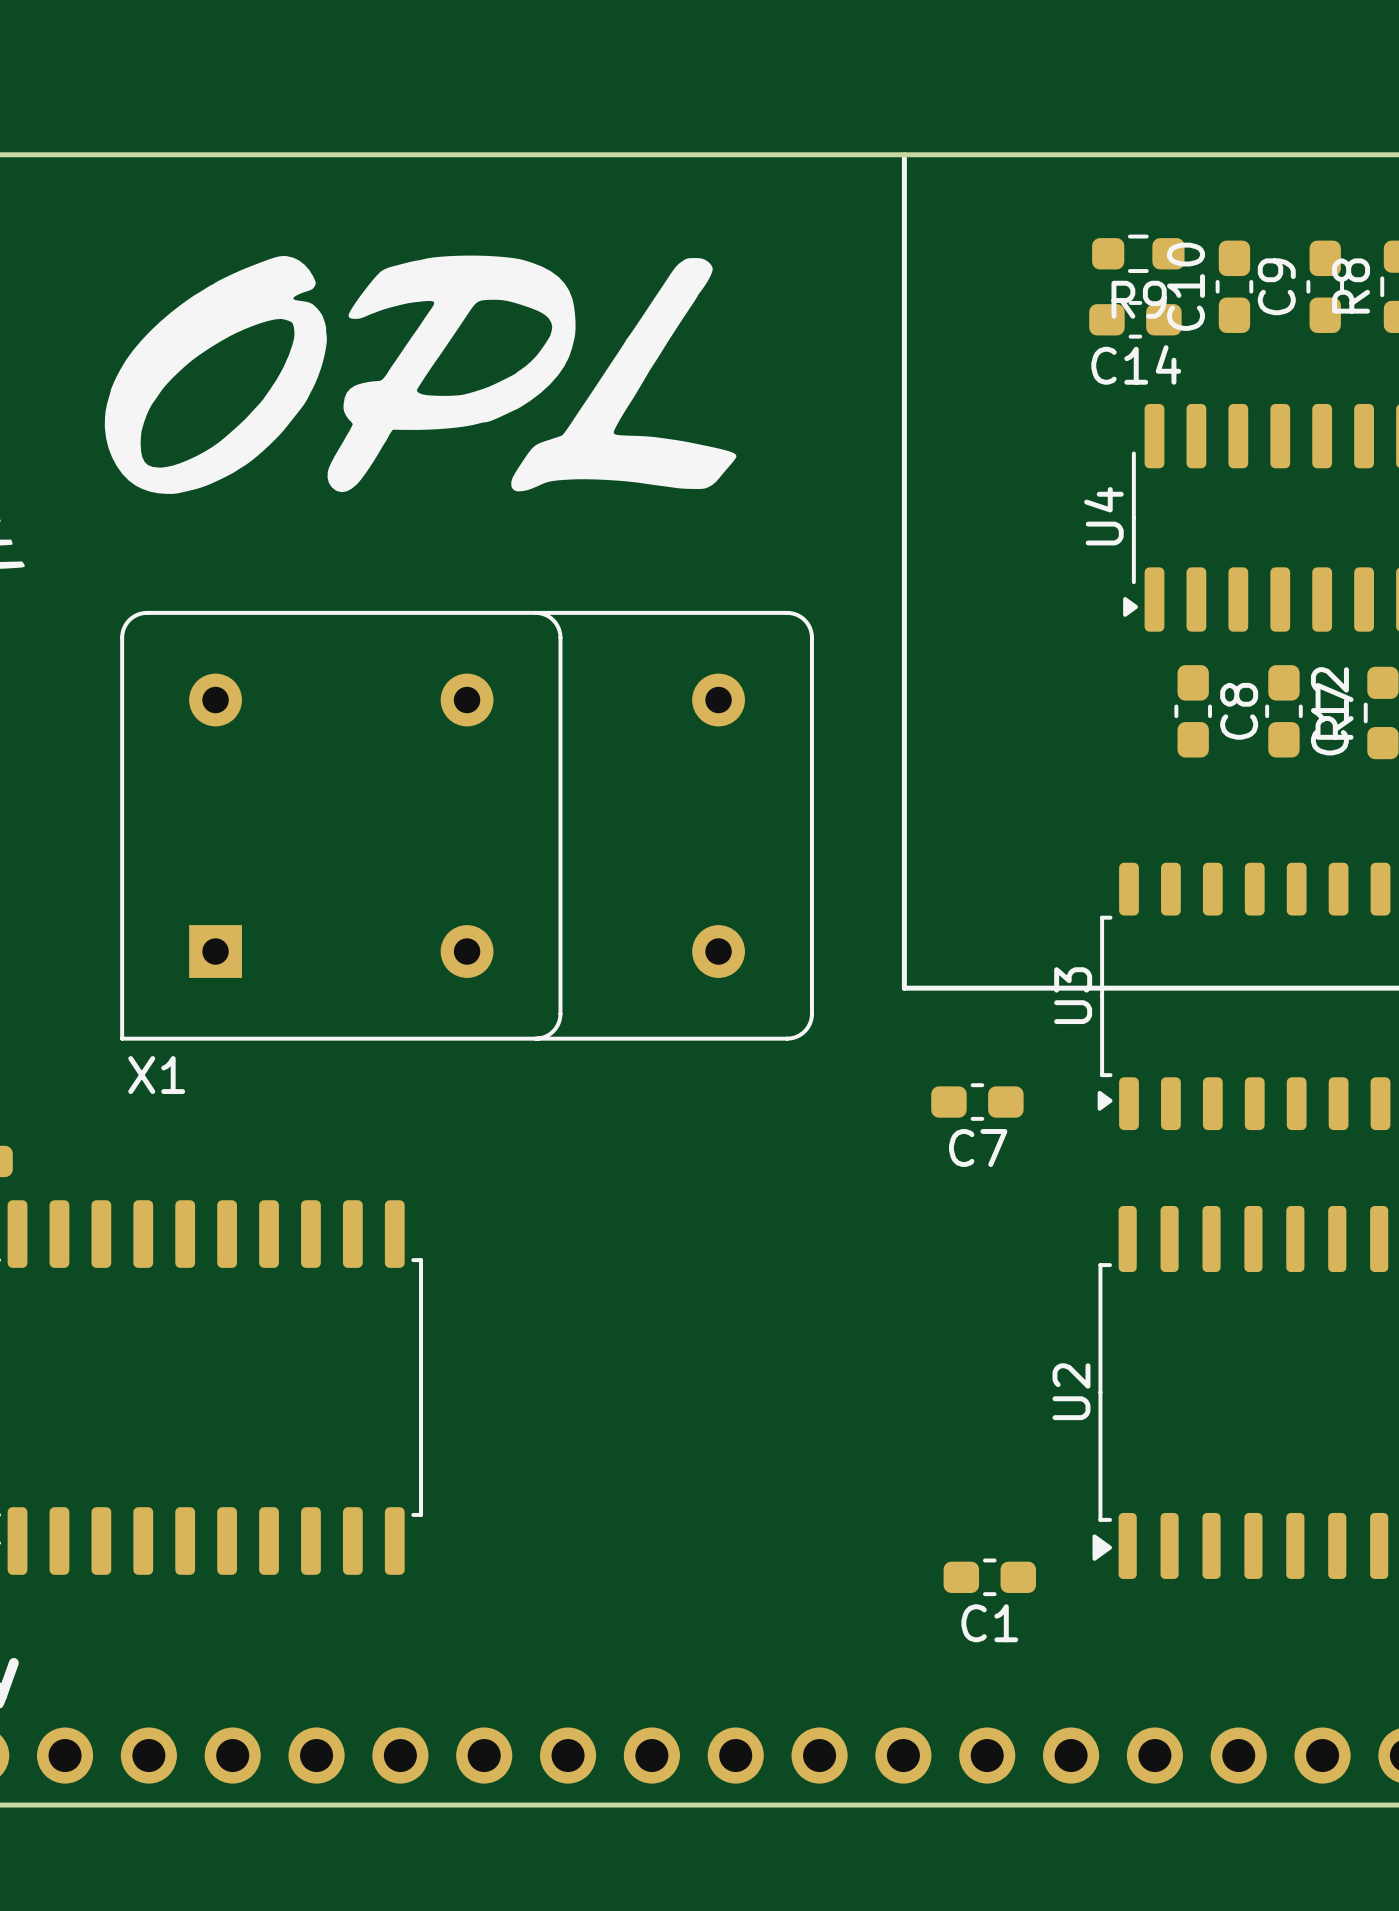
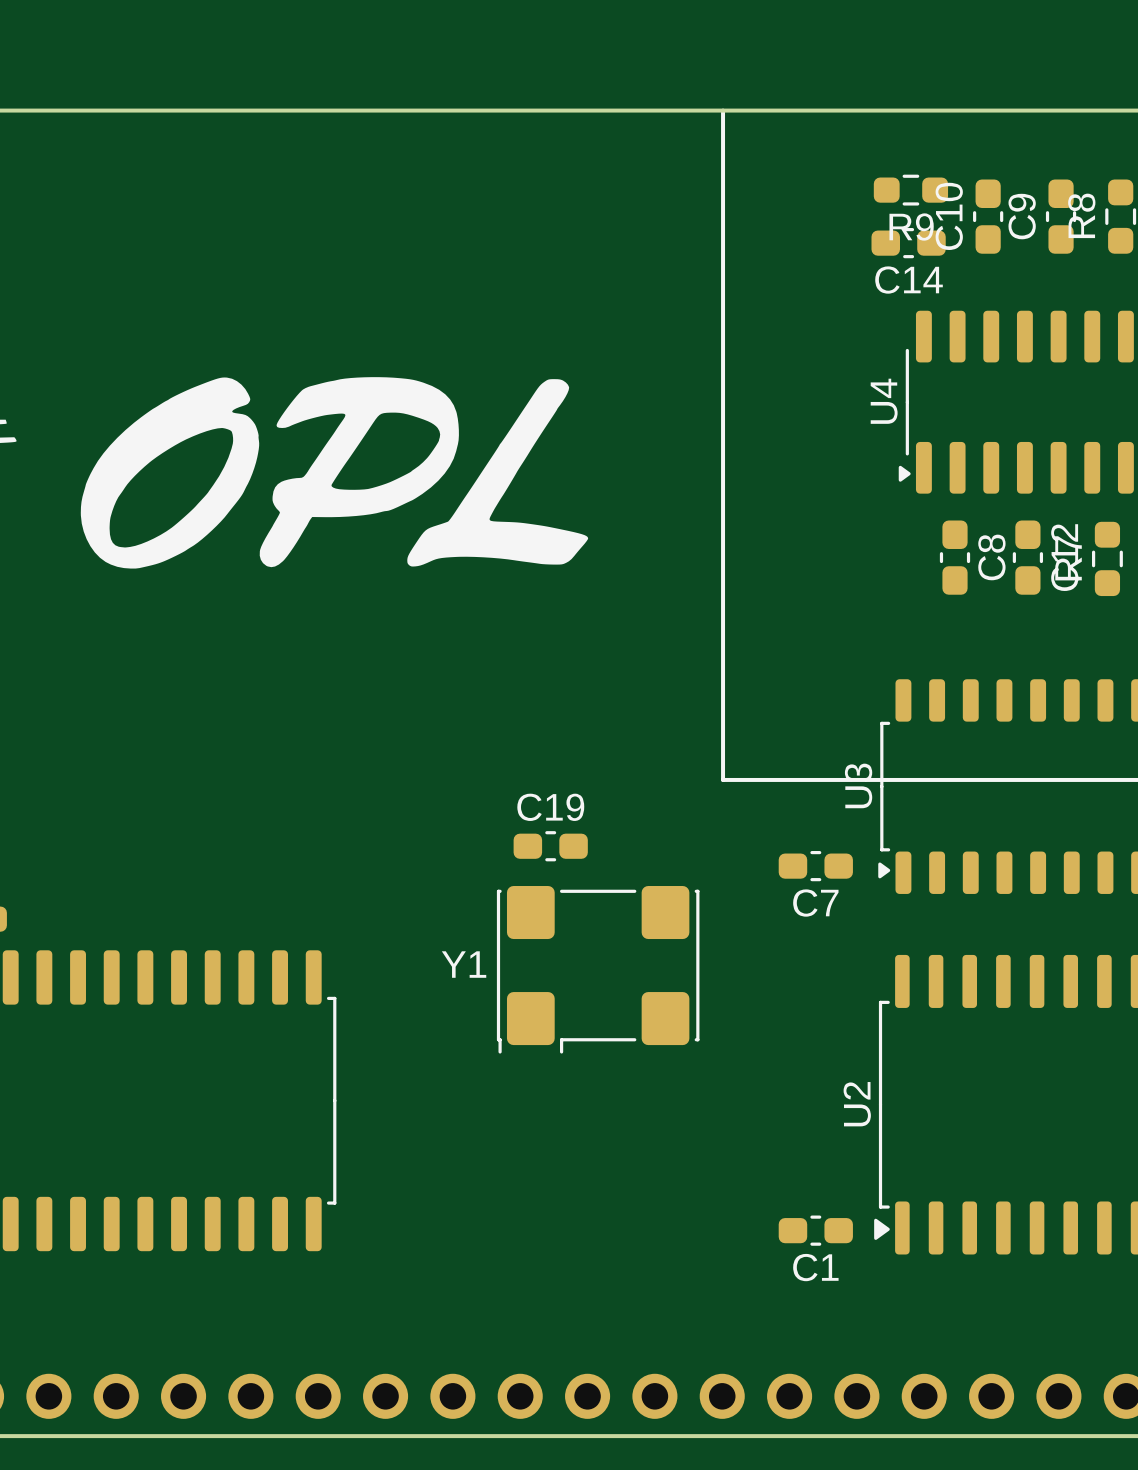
drawing position: (420, 374) -> (334, 472)
X1: (467, 825) -> none
C19: none -> (550, 846)
C7 position: (977, 1102) -> (815, 866)
Y1: none -> (598, 969)
C1 position: (989, 1577) -> (815, 1230)

